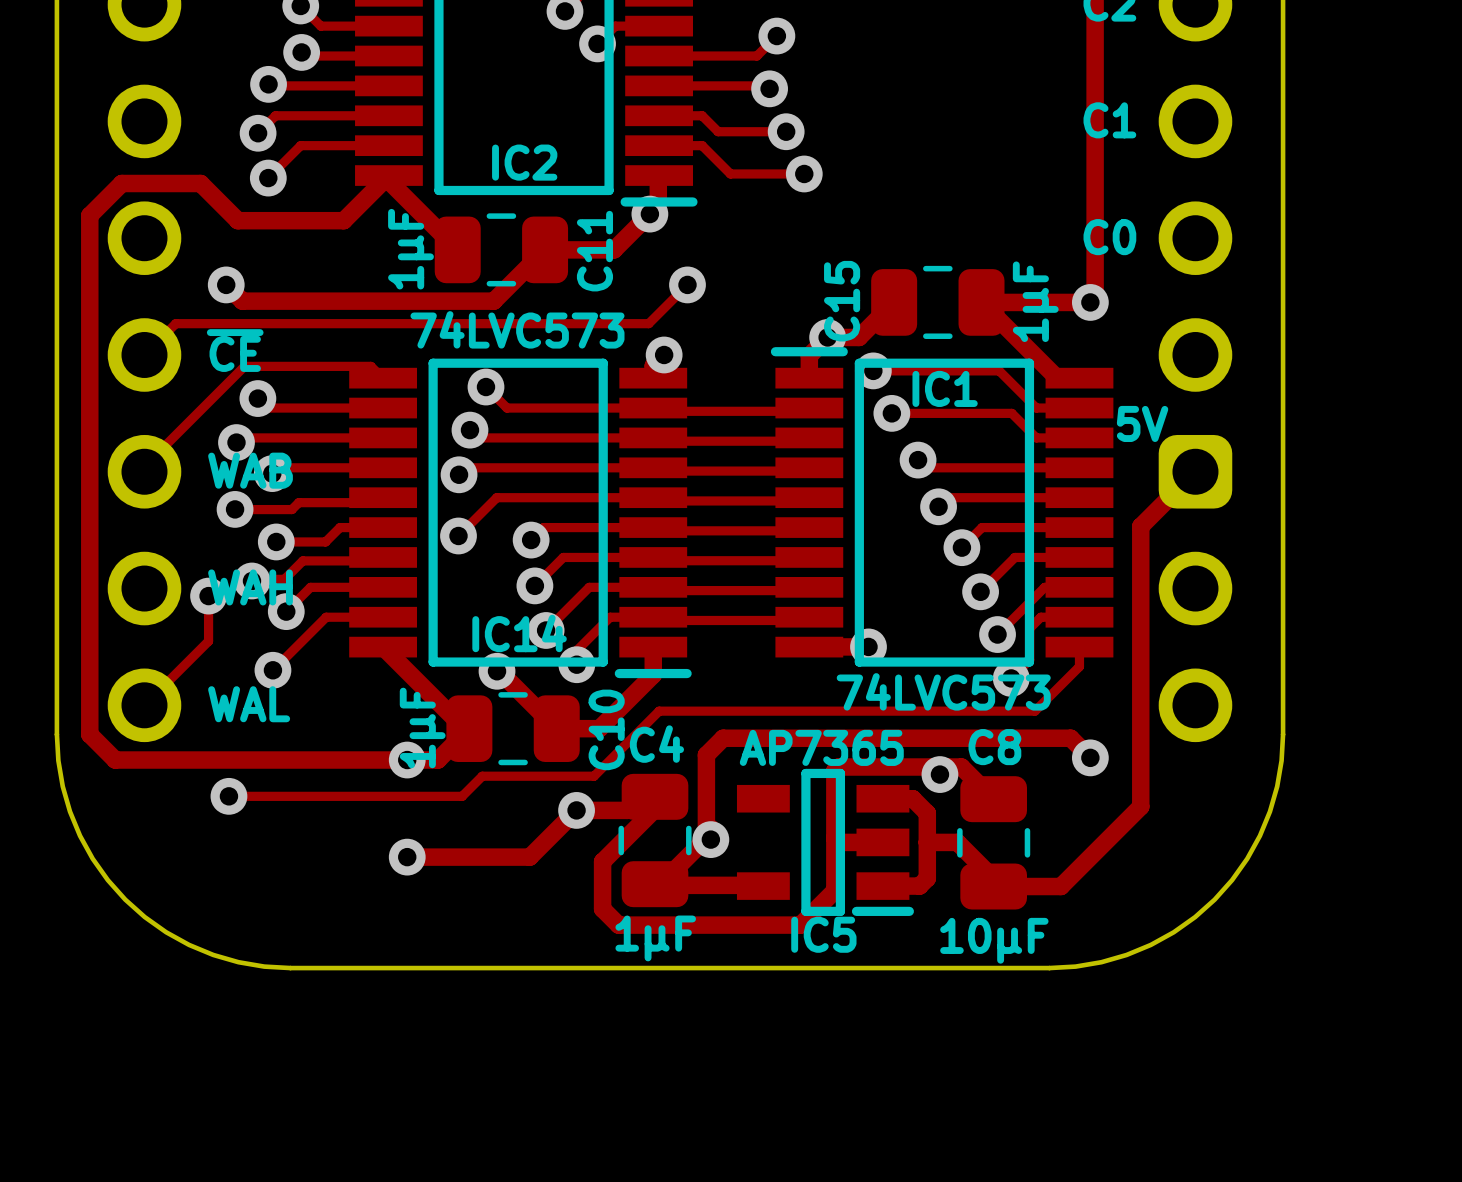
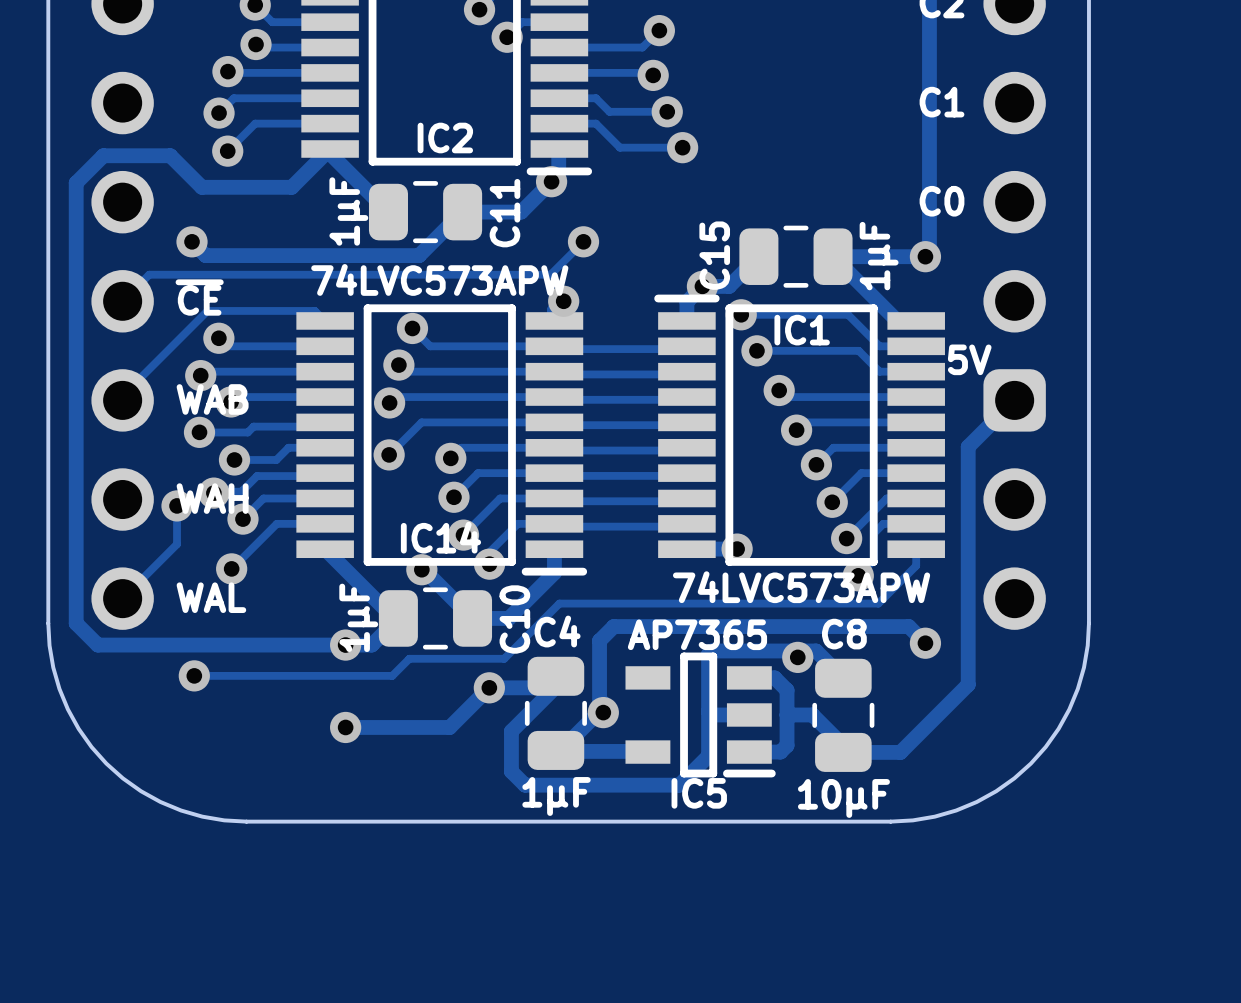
IC14 text: 74LVC573 (517, 329) -> 74LVC573APW (439, 279)
IC1 text: 74LVC573 (943, 691) -> 74LVC573APW (801, 587)

